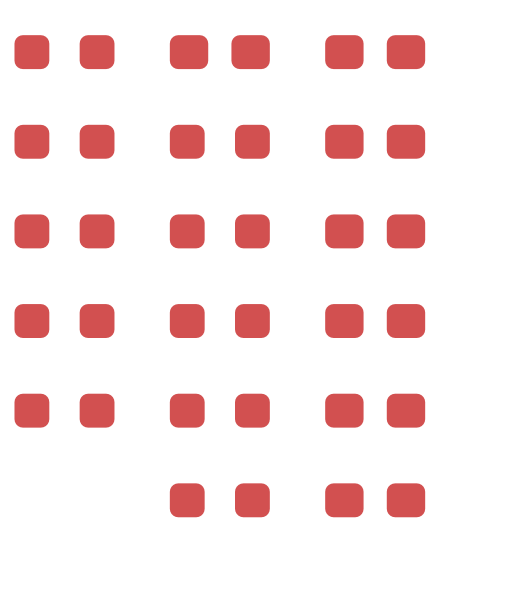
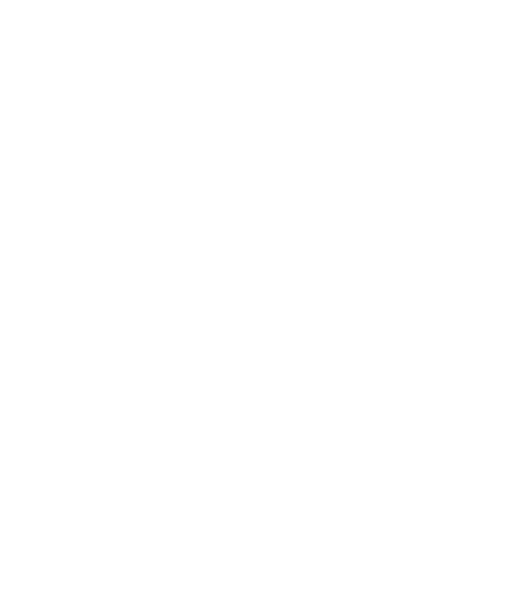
part: (64, 52) -> none
part: (219, 52) -> none
part: (375, 52) -> none
part: (64, 141) -> none
part: (219, 141) -> none
part: (375, 141) -> none
part: (64, 231) -> none
part: (219, 231) -> none
part: (375, 231) -> none
part: (64, 321) -> none
part: (219, 321) -> none
part: (375, 321) -> none
part: (64, 410) -> none
part: (219, 410) -> none
part: (375, 410) -> none
part: (219, 500) -> none
part: (375, 500) -> none

